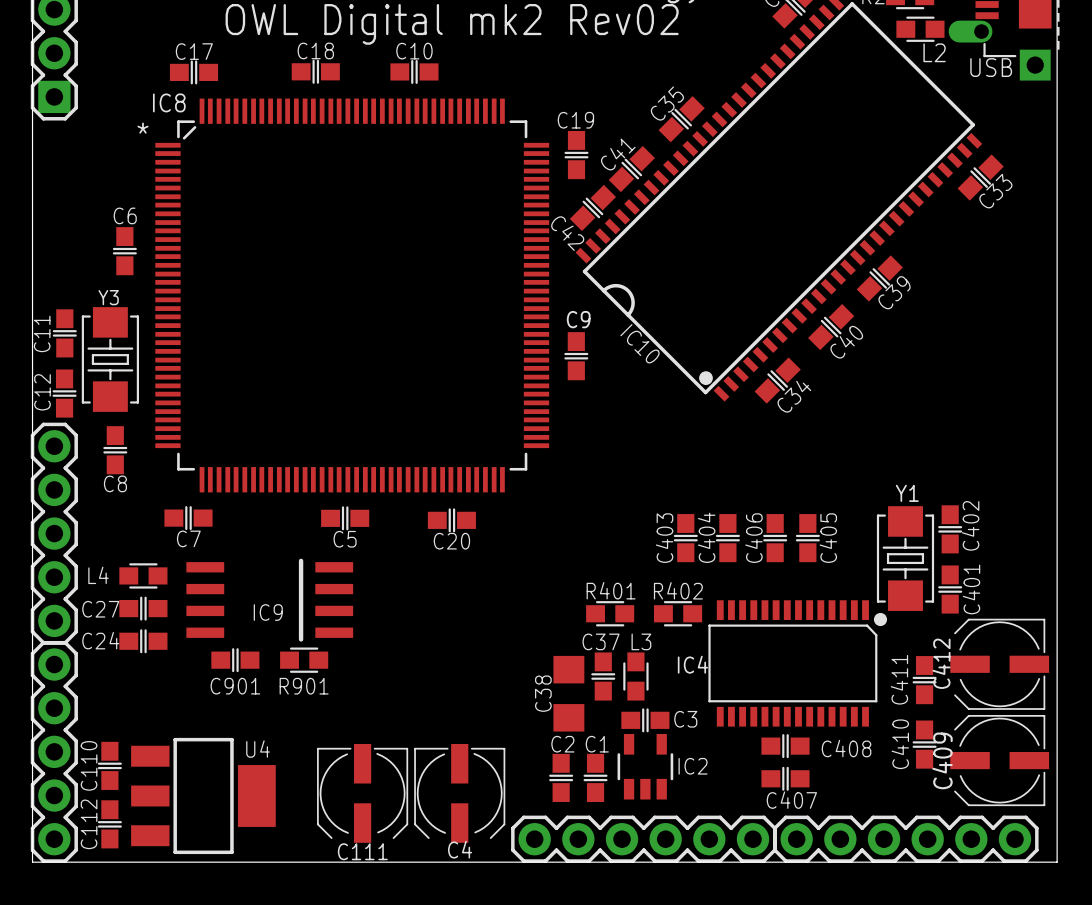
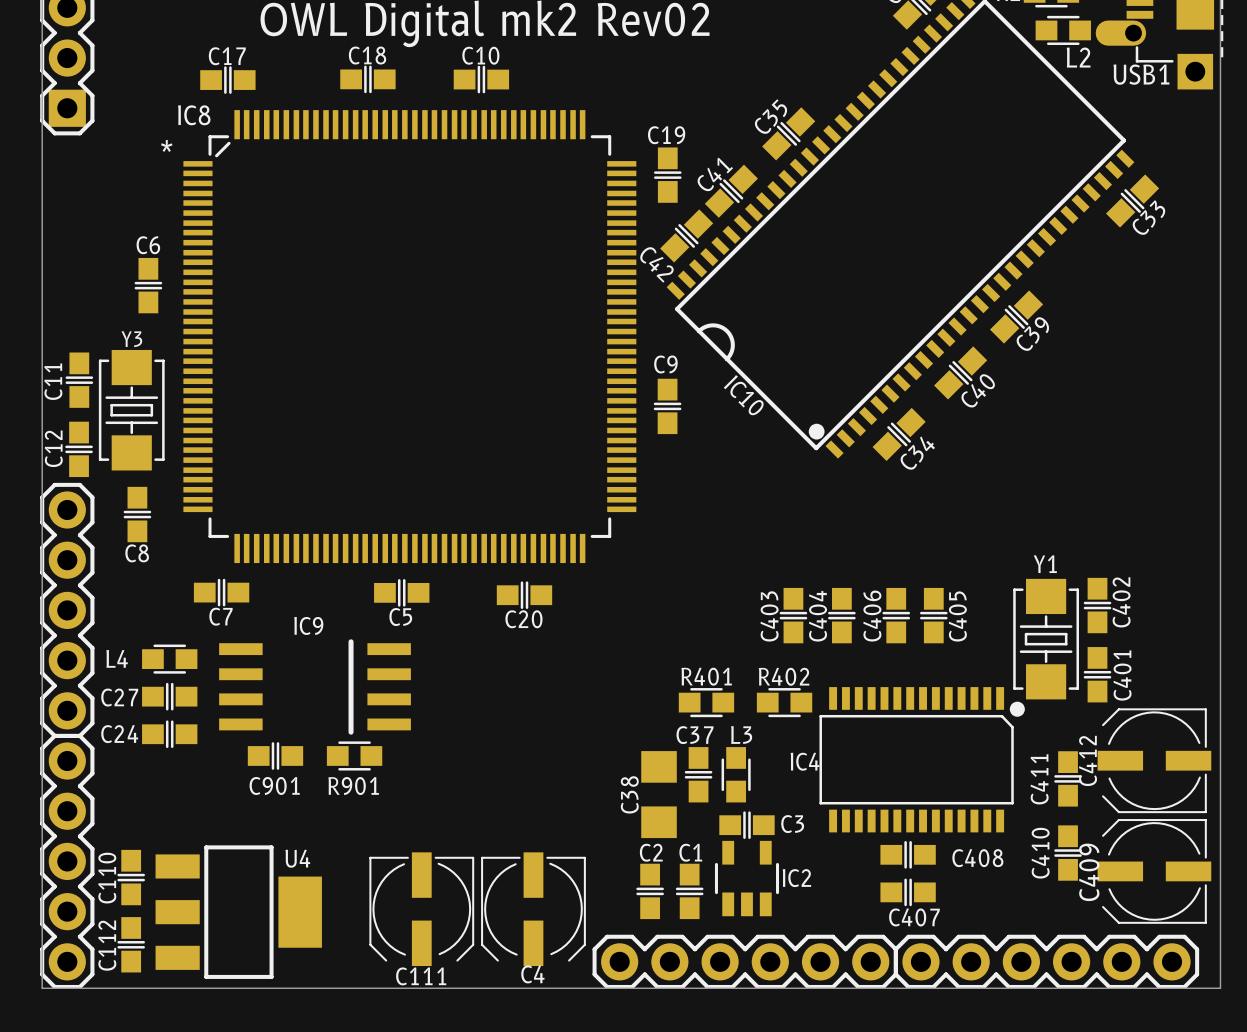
USB name: USB (991, 67) -> USB1 (1141, 74)
IC9 name position: IC9 (268, 612) -> IC9 (308, 625)

